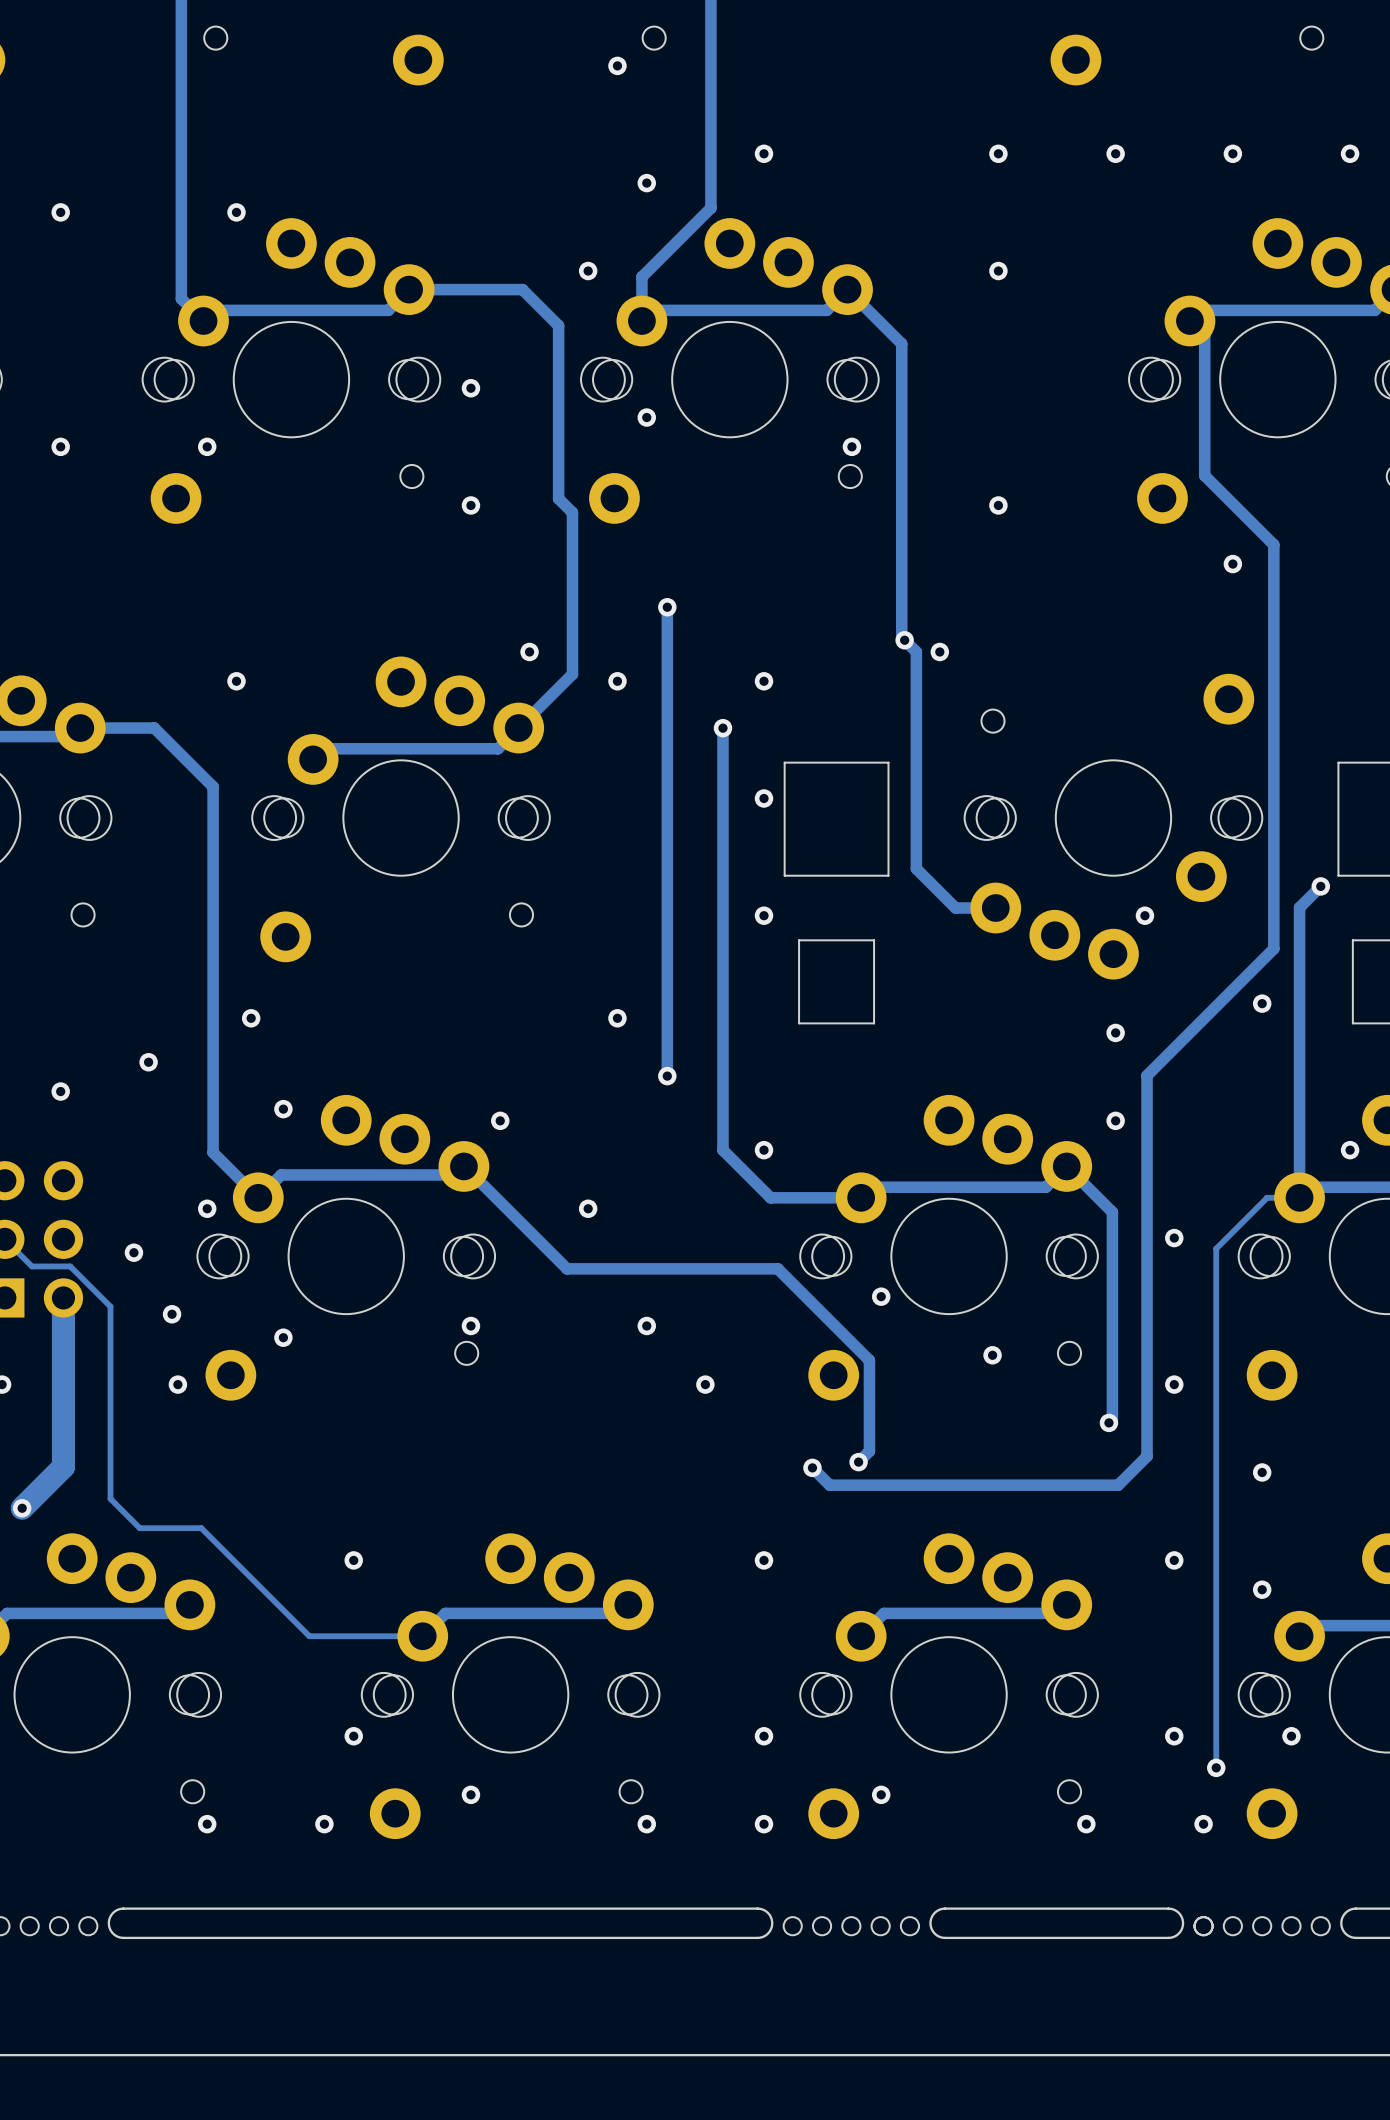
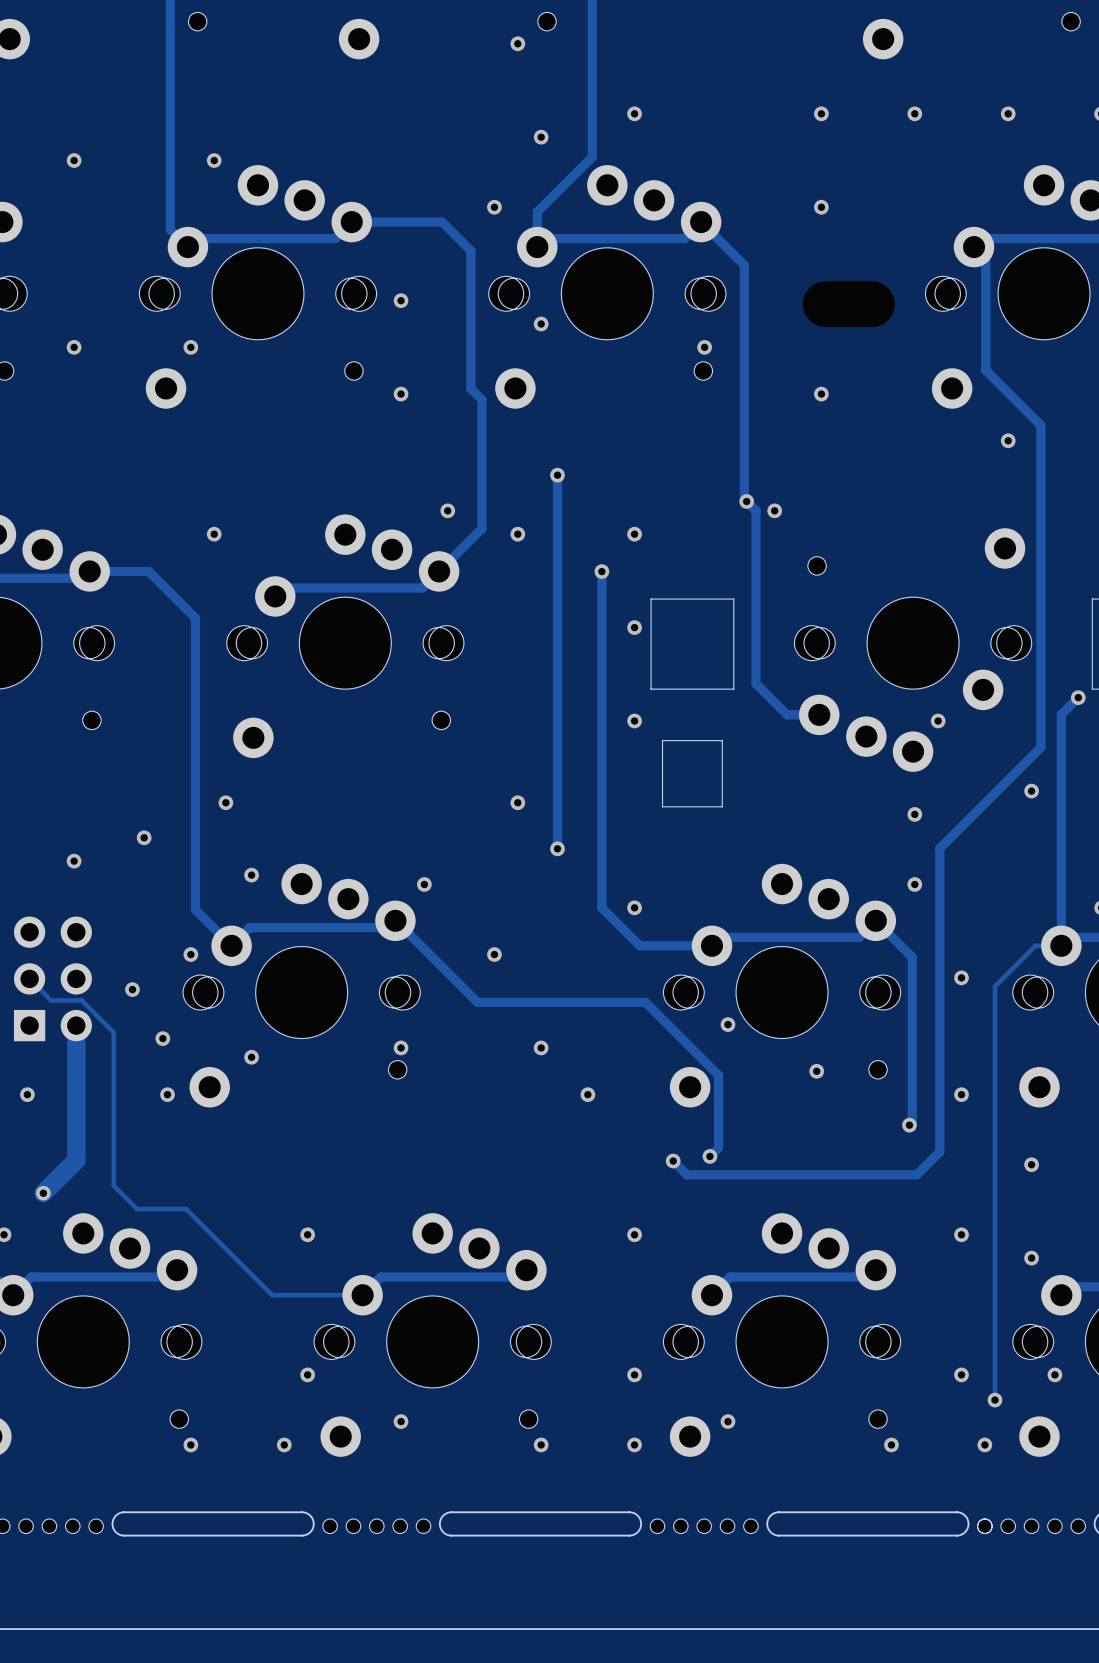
board edge: (534, 1908) (346, 1908) -> (451, 1512) (443, 1515) (439, 1523) (443, 1532) (451, 1535)
part: none -> (376, 1526)
board edge: (534, 1937) (346, 1937) -> (302, 1512) (309, 1515) (313, 1523) (309, 1532) (302, 1535)

